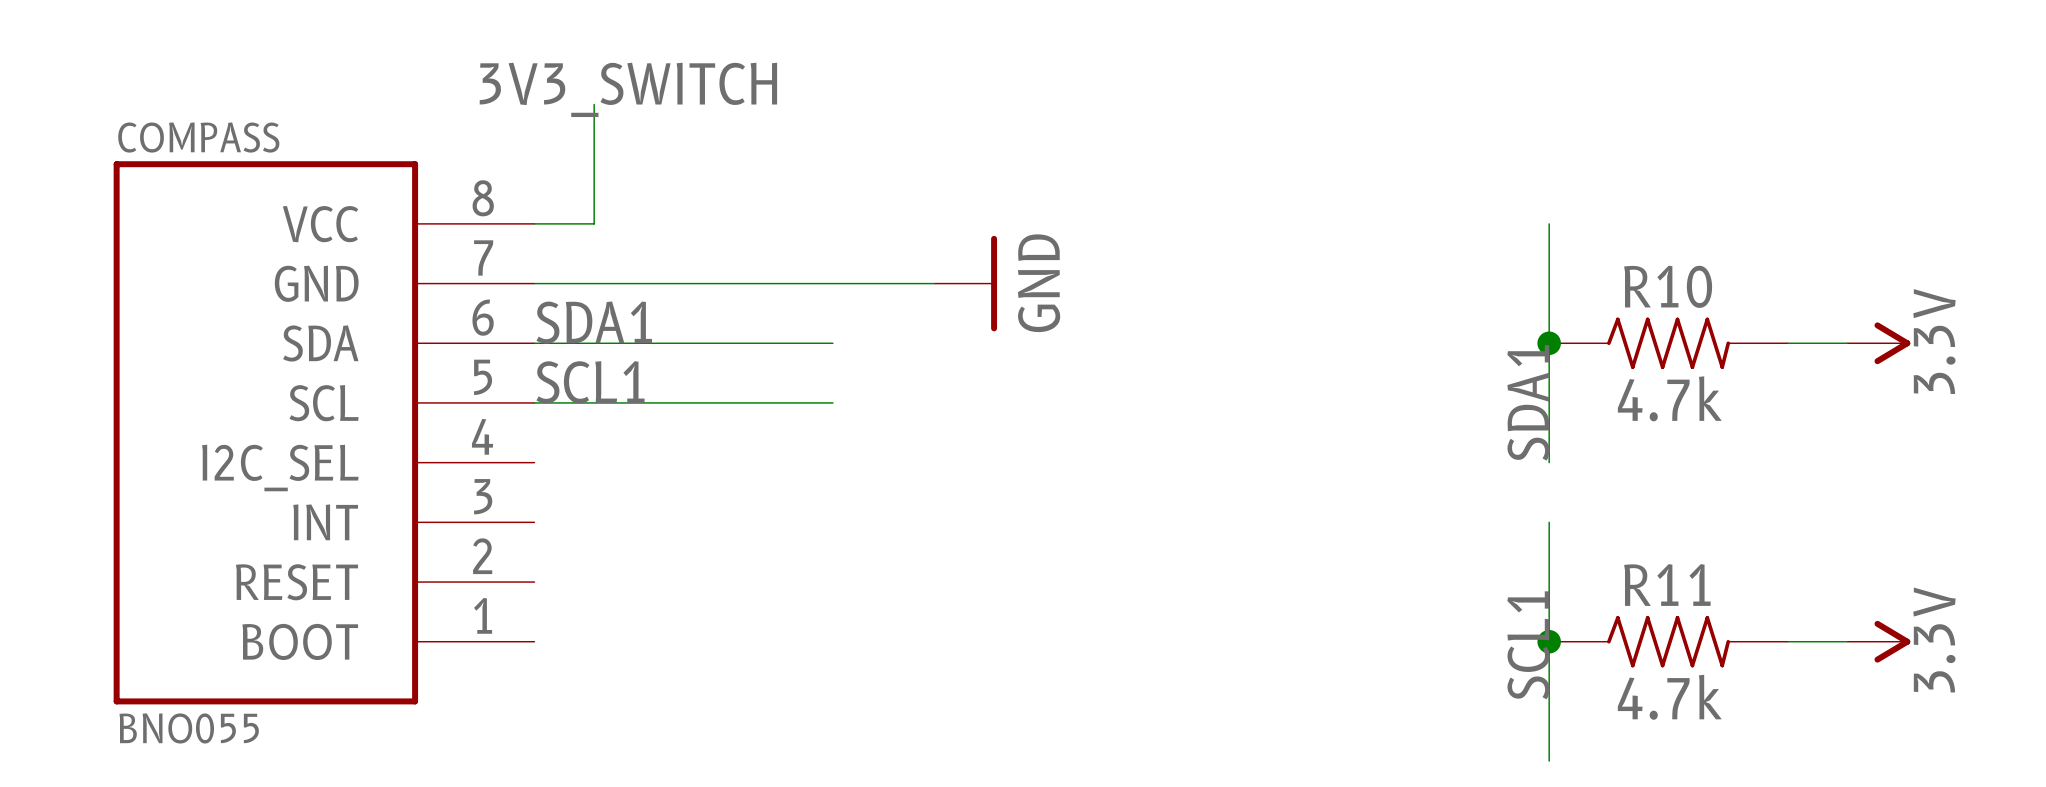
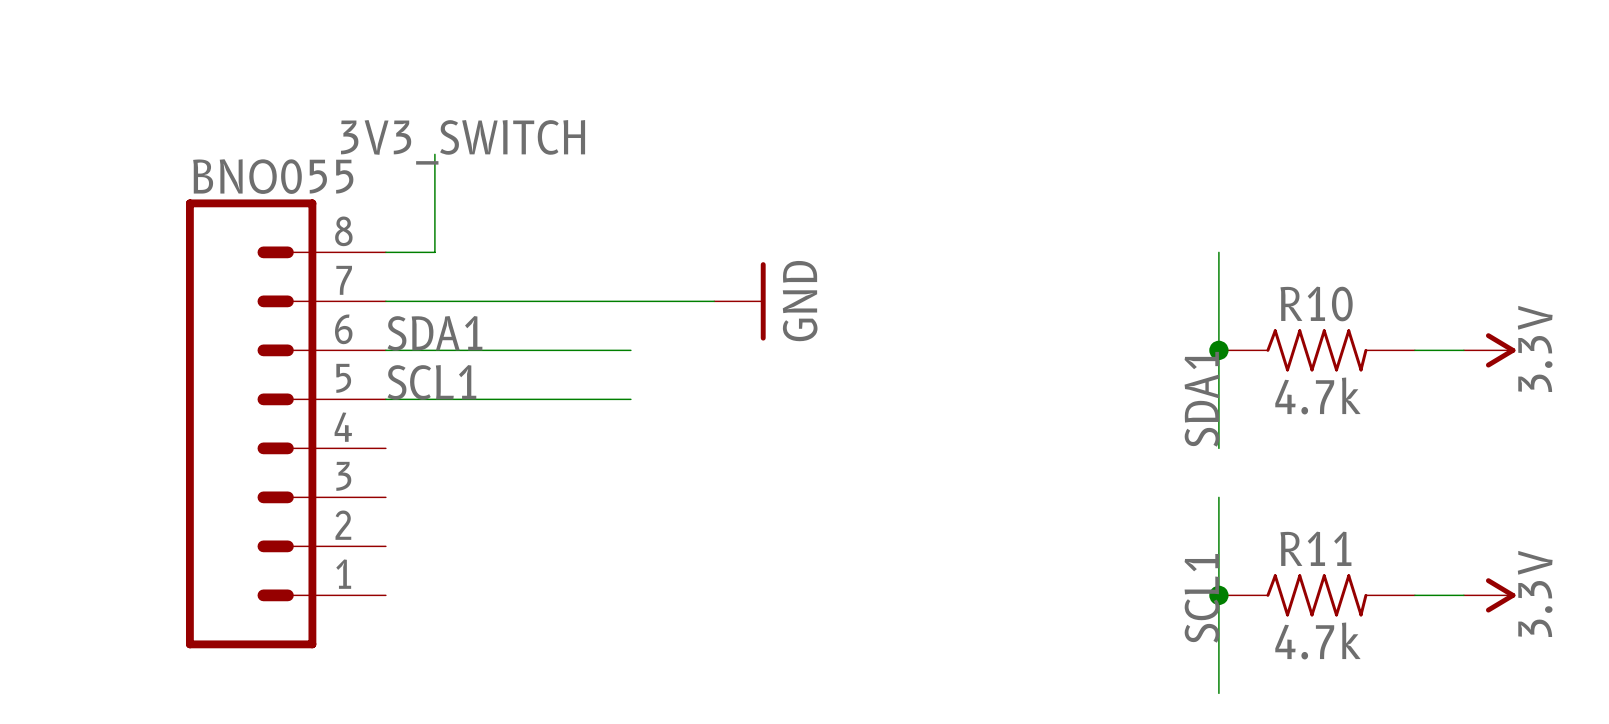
COMPASS: (324, 432) -> none
BNO055: none -> (285, 423)

